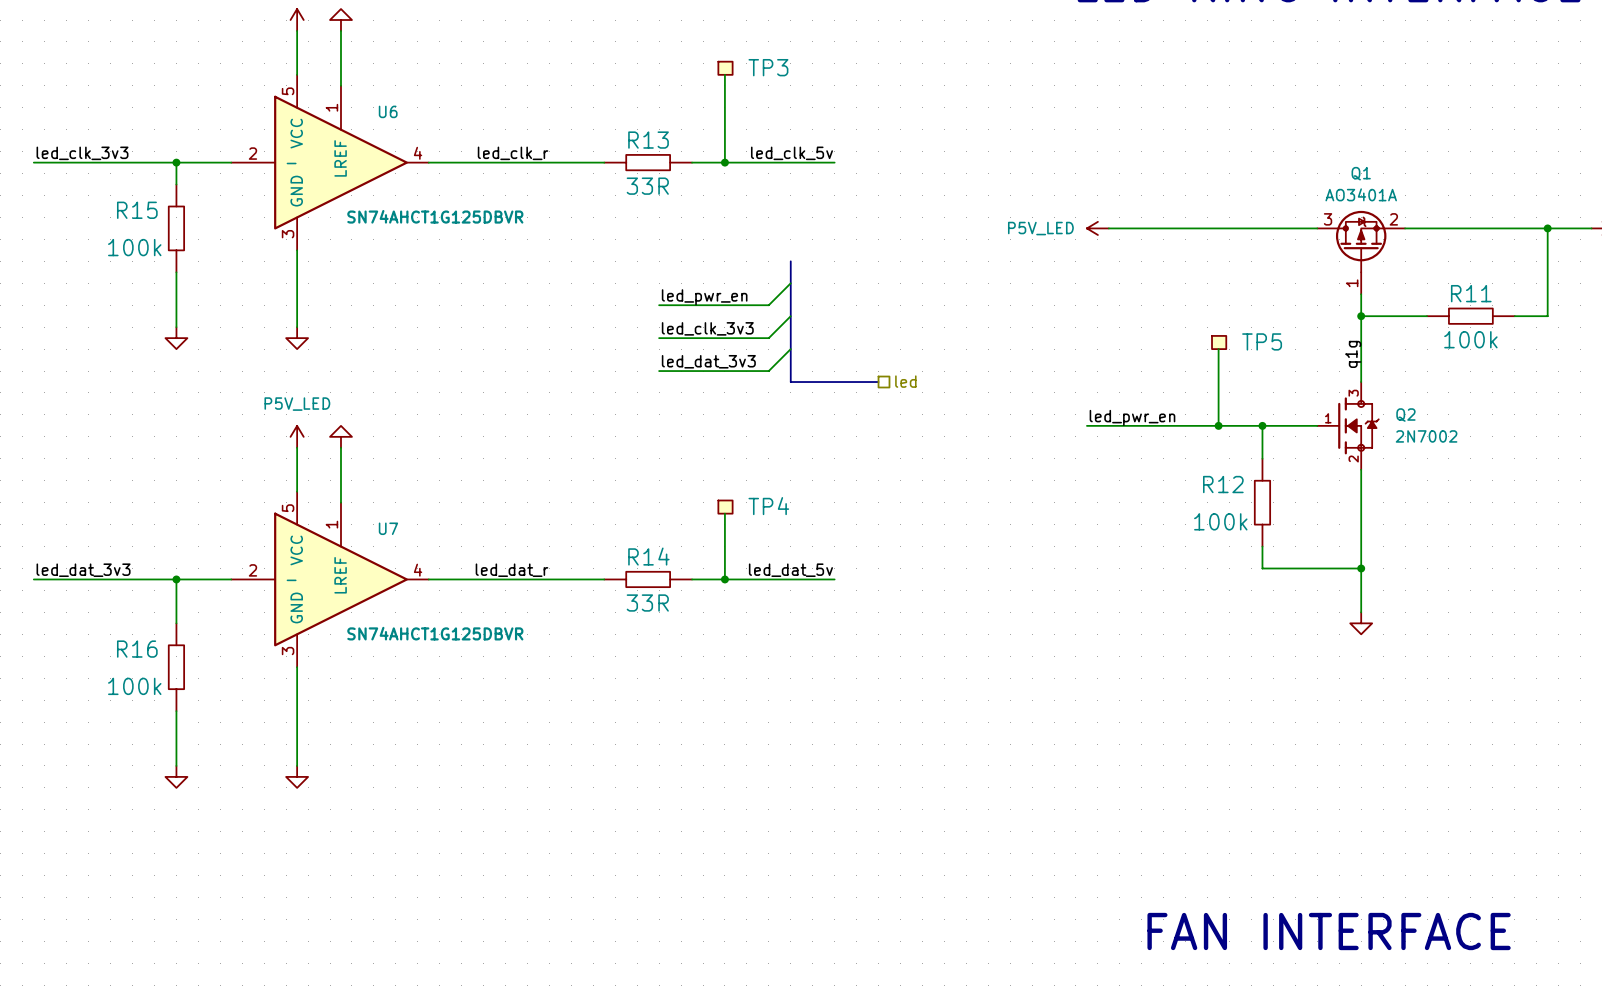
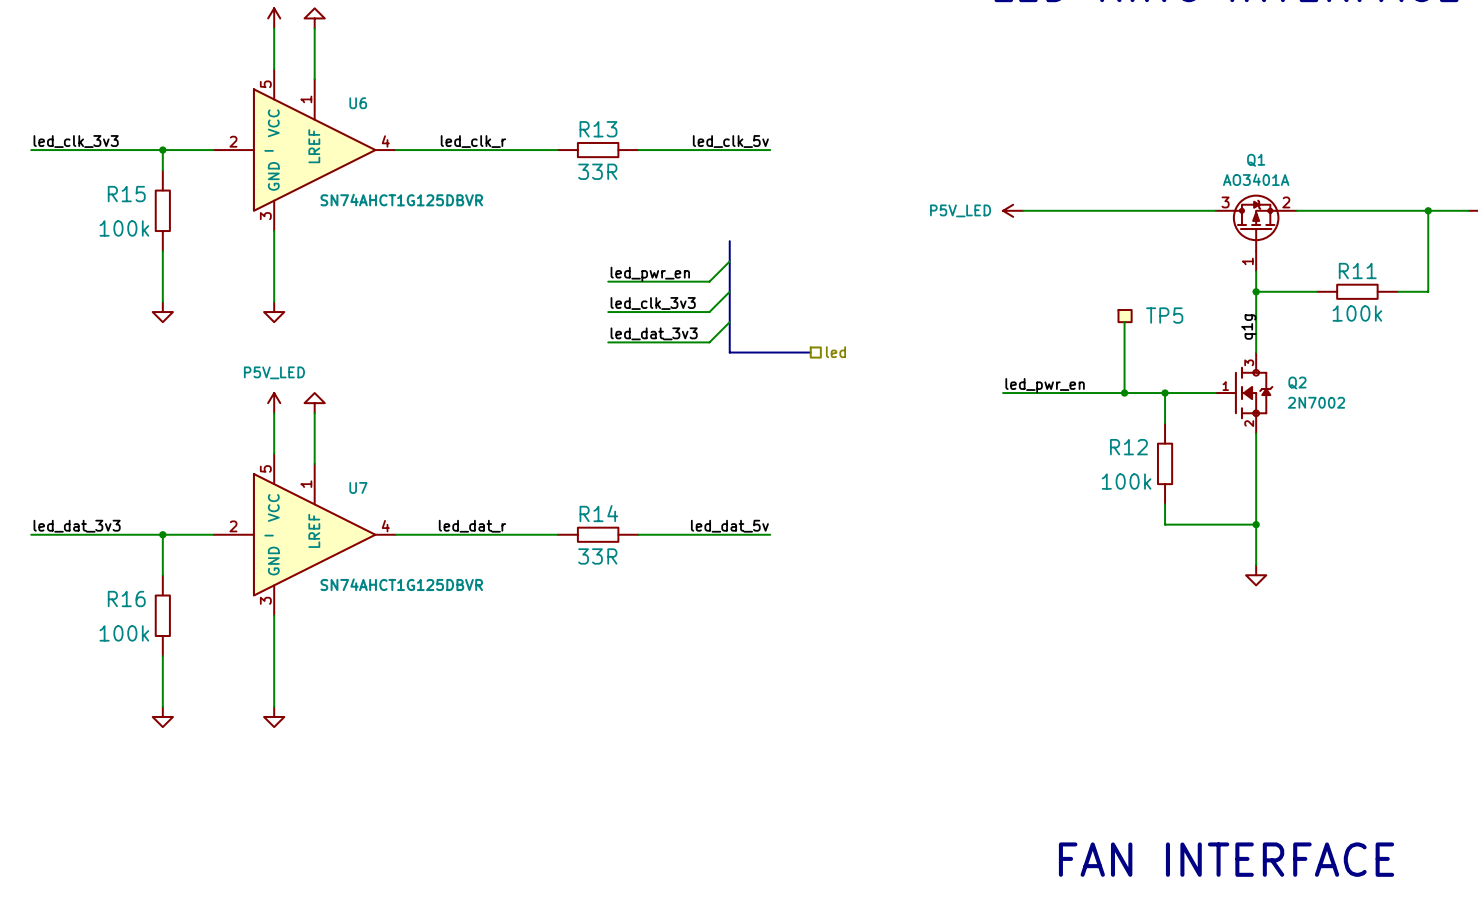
TP3: (725, 68) -> none
wire: (724, 74) (724, 162) -> none
junction: (724, 162) -> none
TP4: (725, 507) -> none
wire: (724, 513) (724, 579) -> none
junction: (724, 579) -> none

